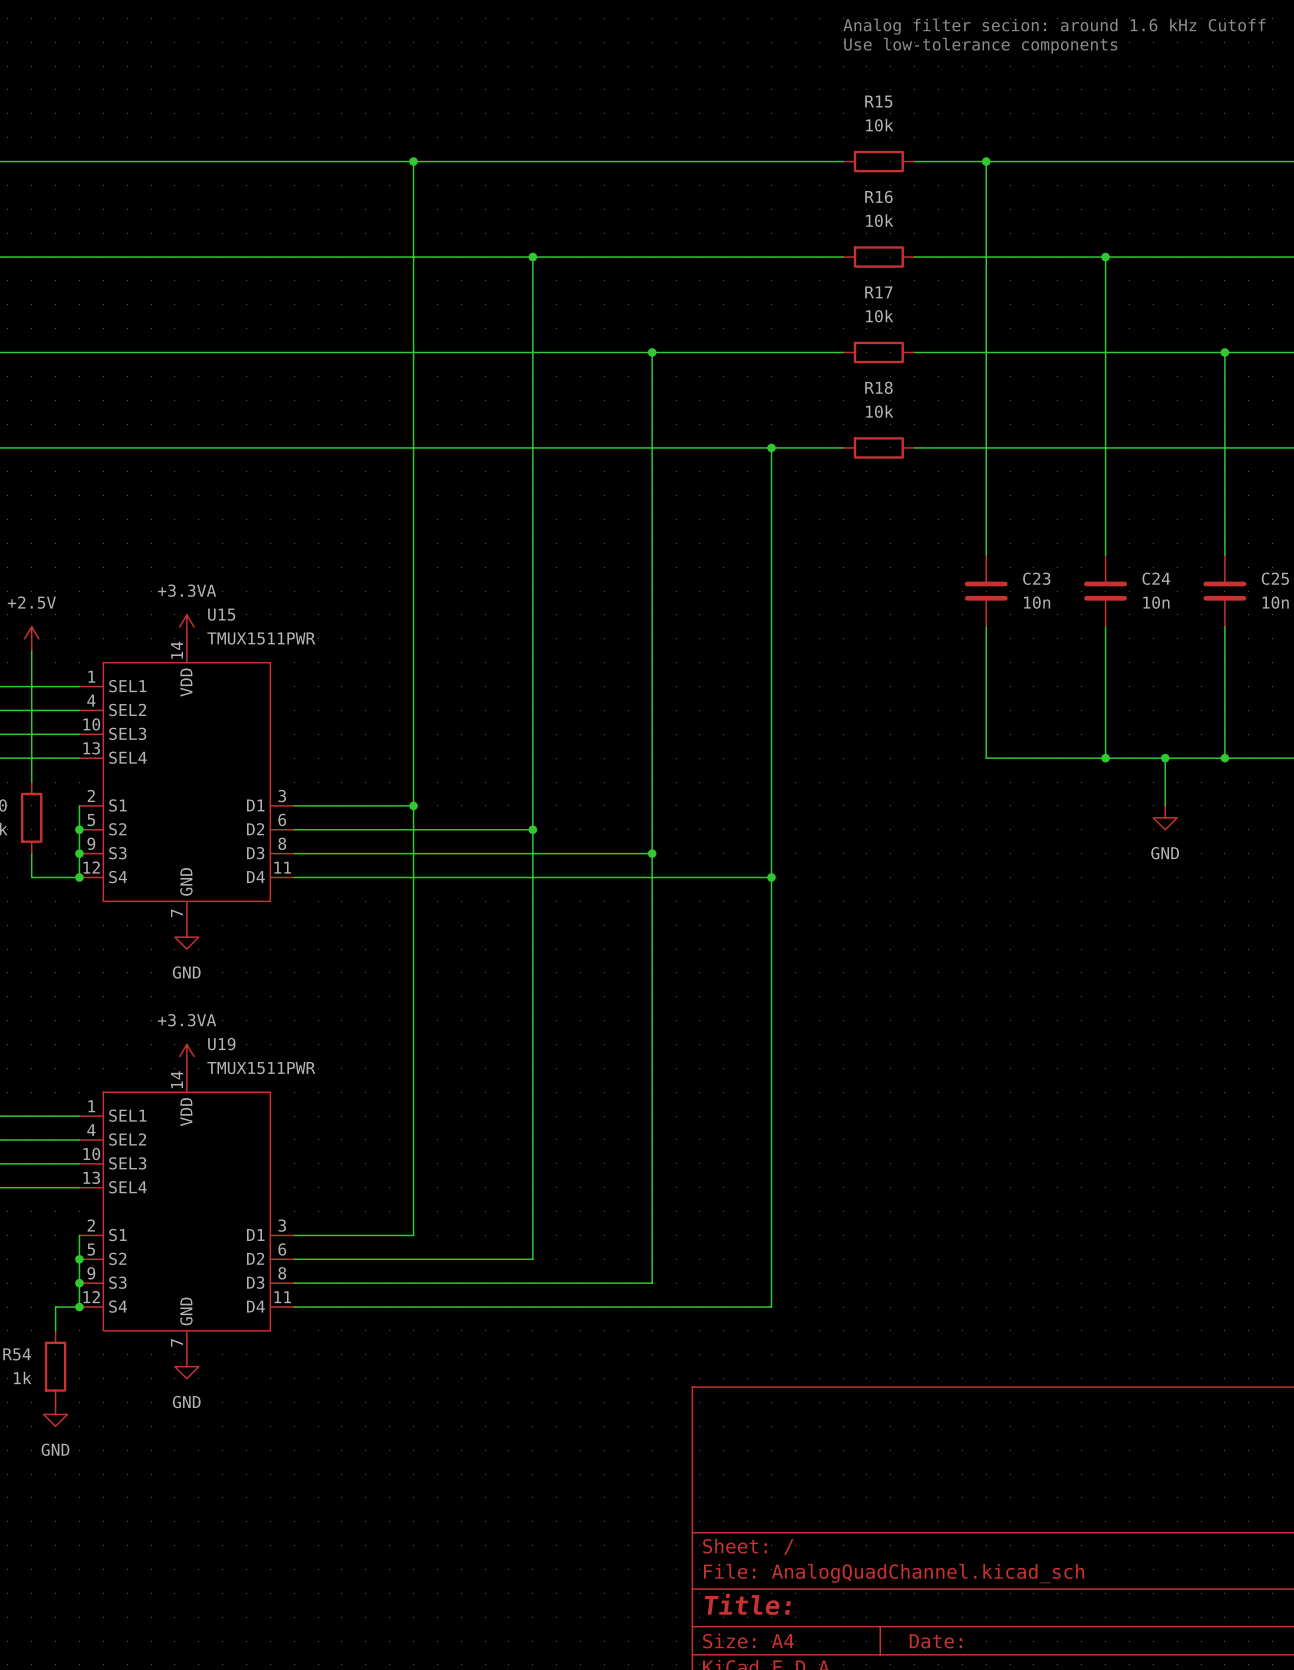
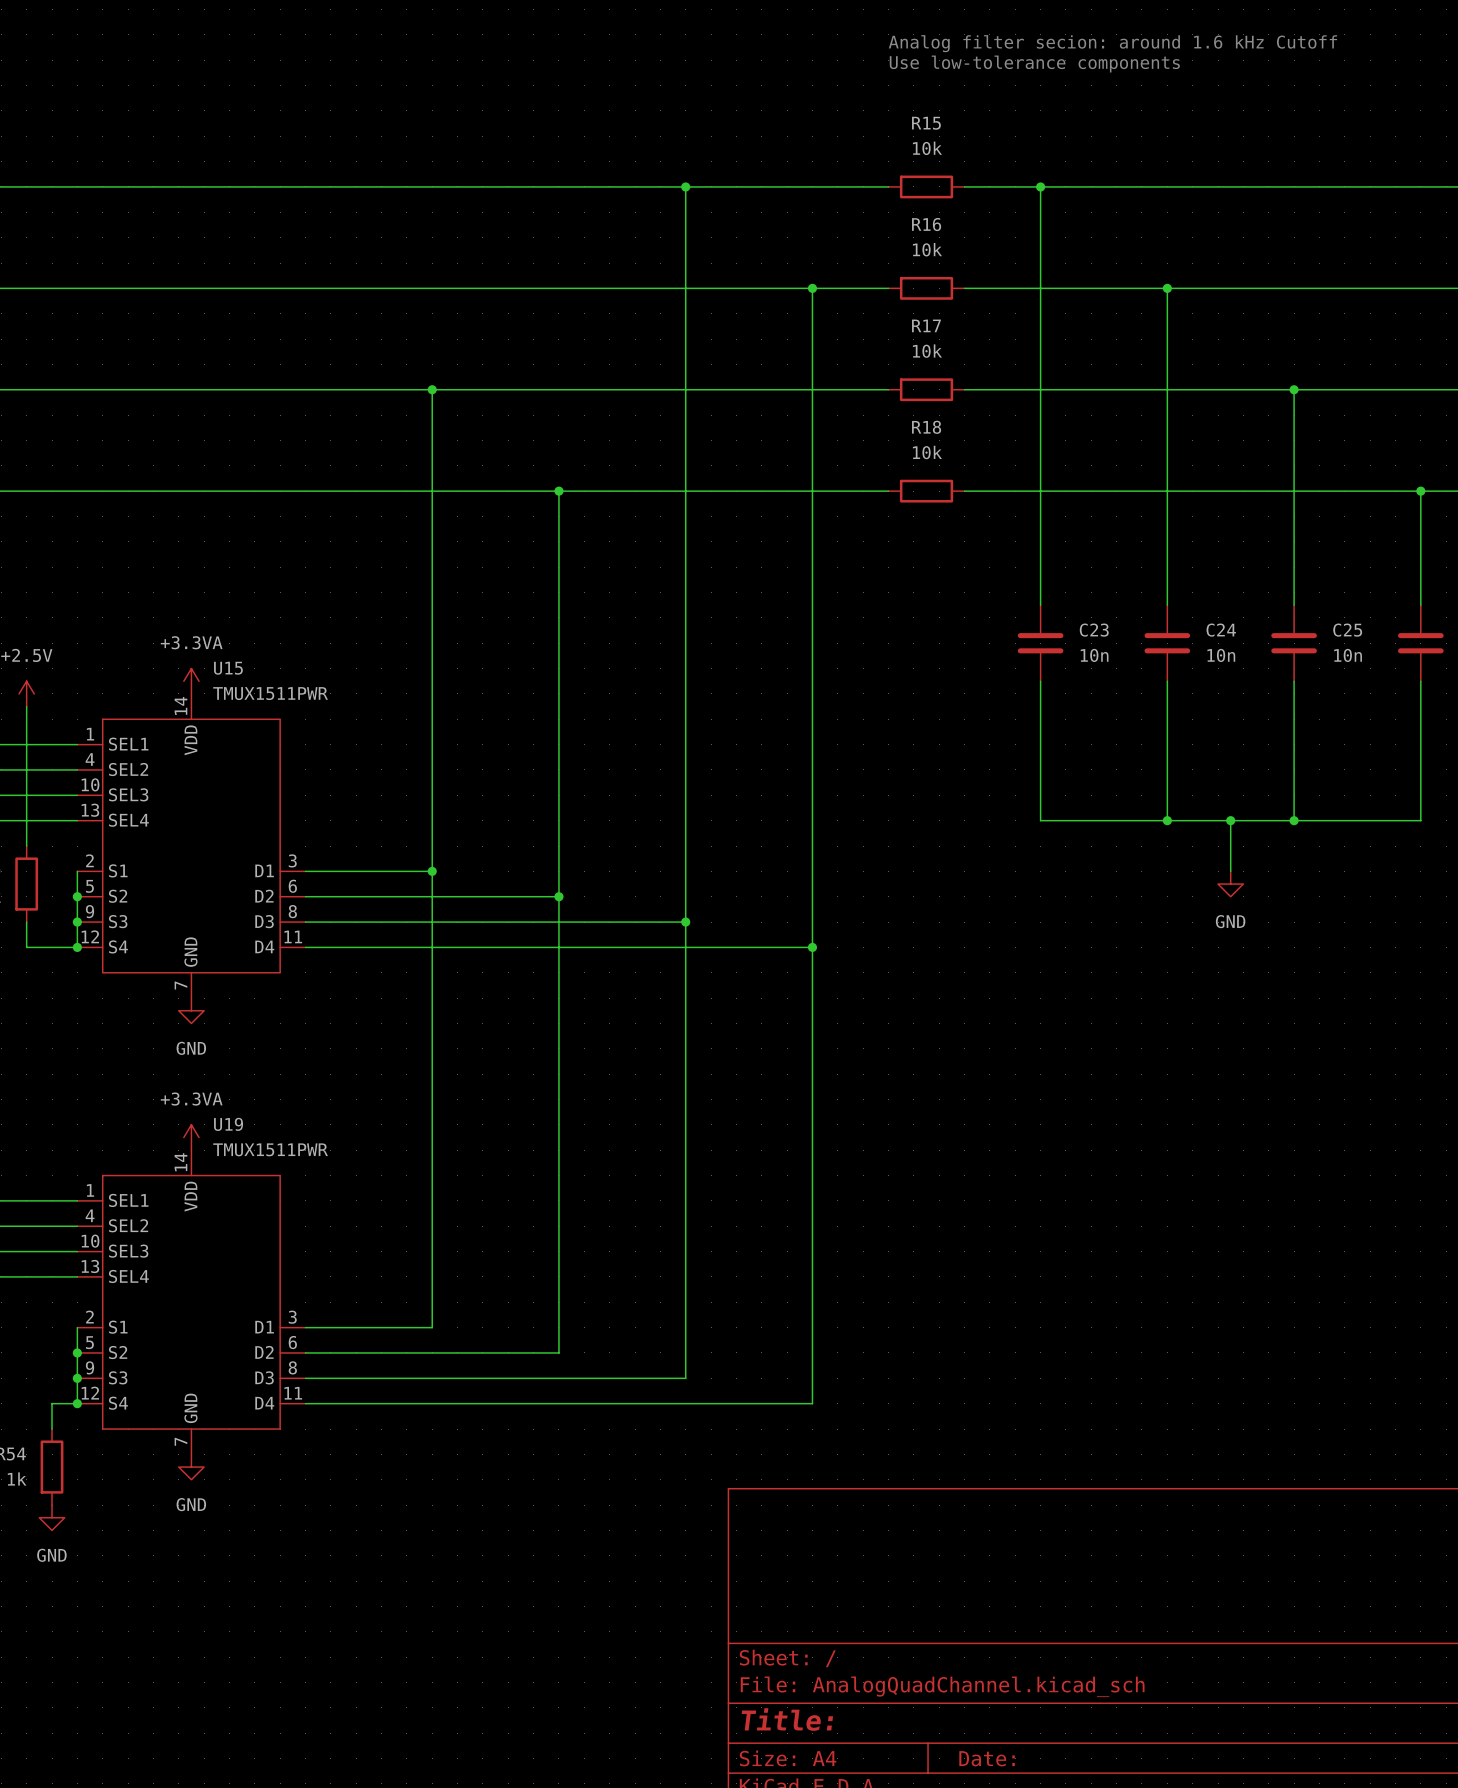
wire: (413, 161) (413, 352) -> none
junction: (413, 161) -> none
junction: none -> (685, 186)
wire: (532, 257) (532, 447) -> (685, 186) (685, 389)
junction: (532, 257) -> none
wire: none -> (812, 288) (812, 491)
junction: none -> (812, 288)
junction: none -> (432, 389)
junction: (652, 352) -> none
junction: none -> (558, 491)
junction: (771, 447) -> none

